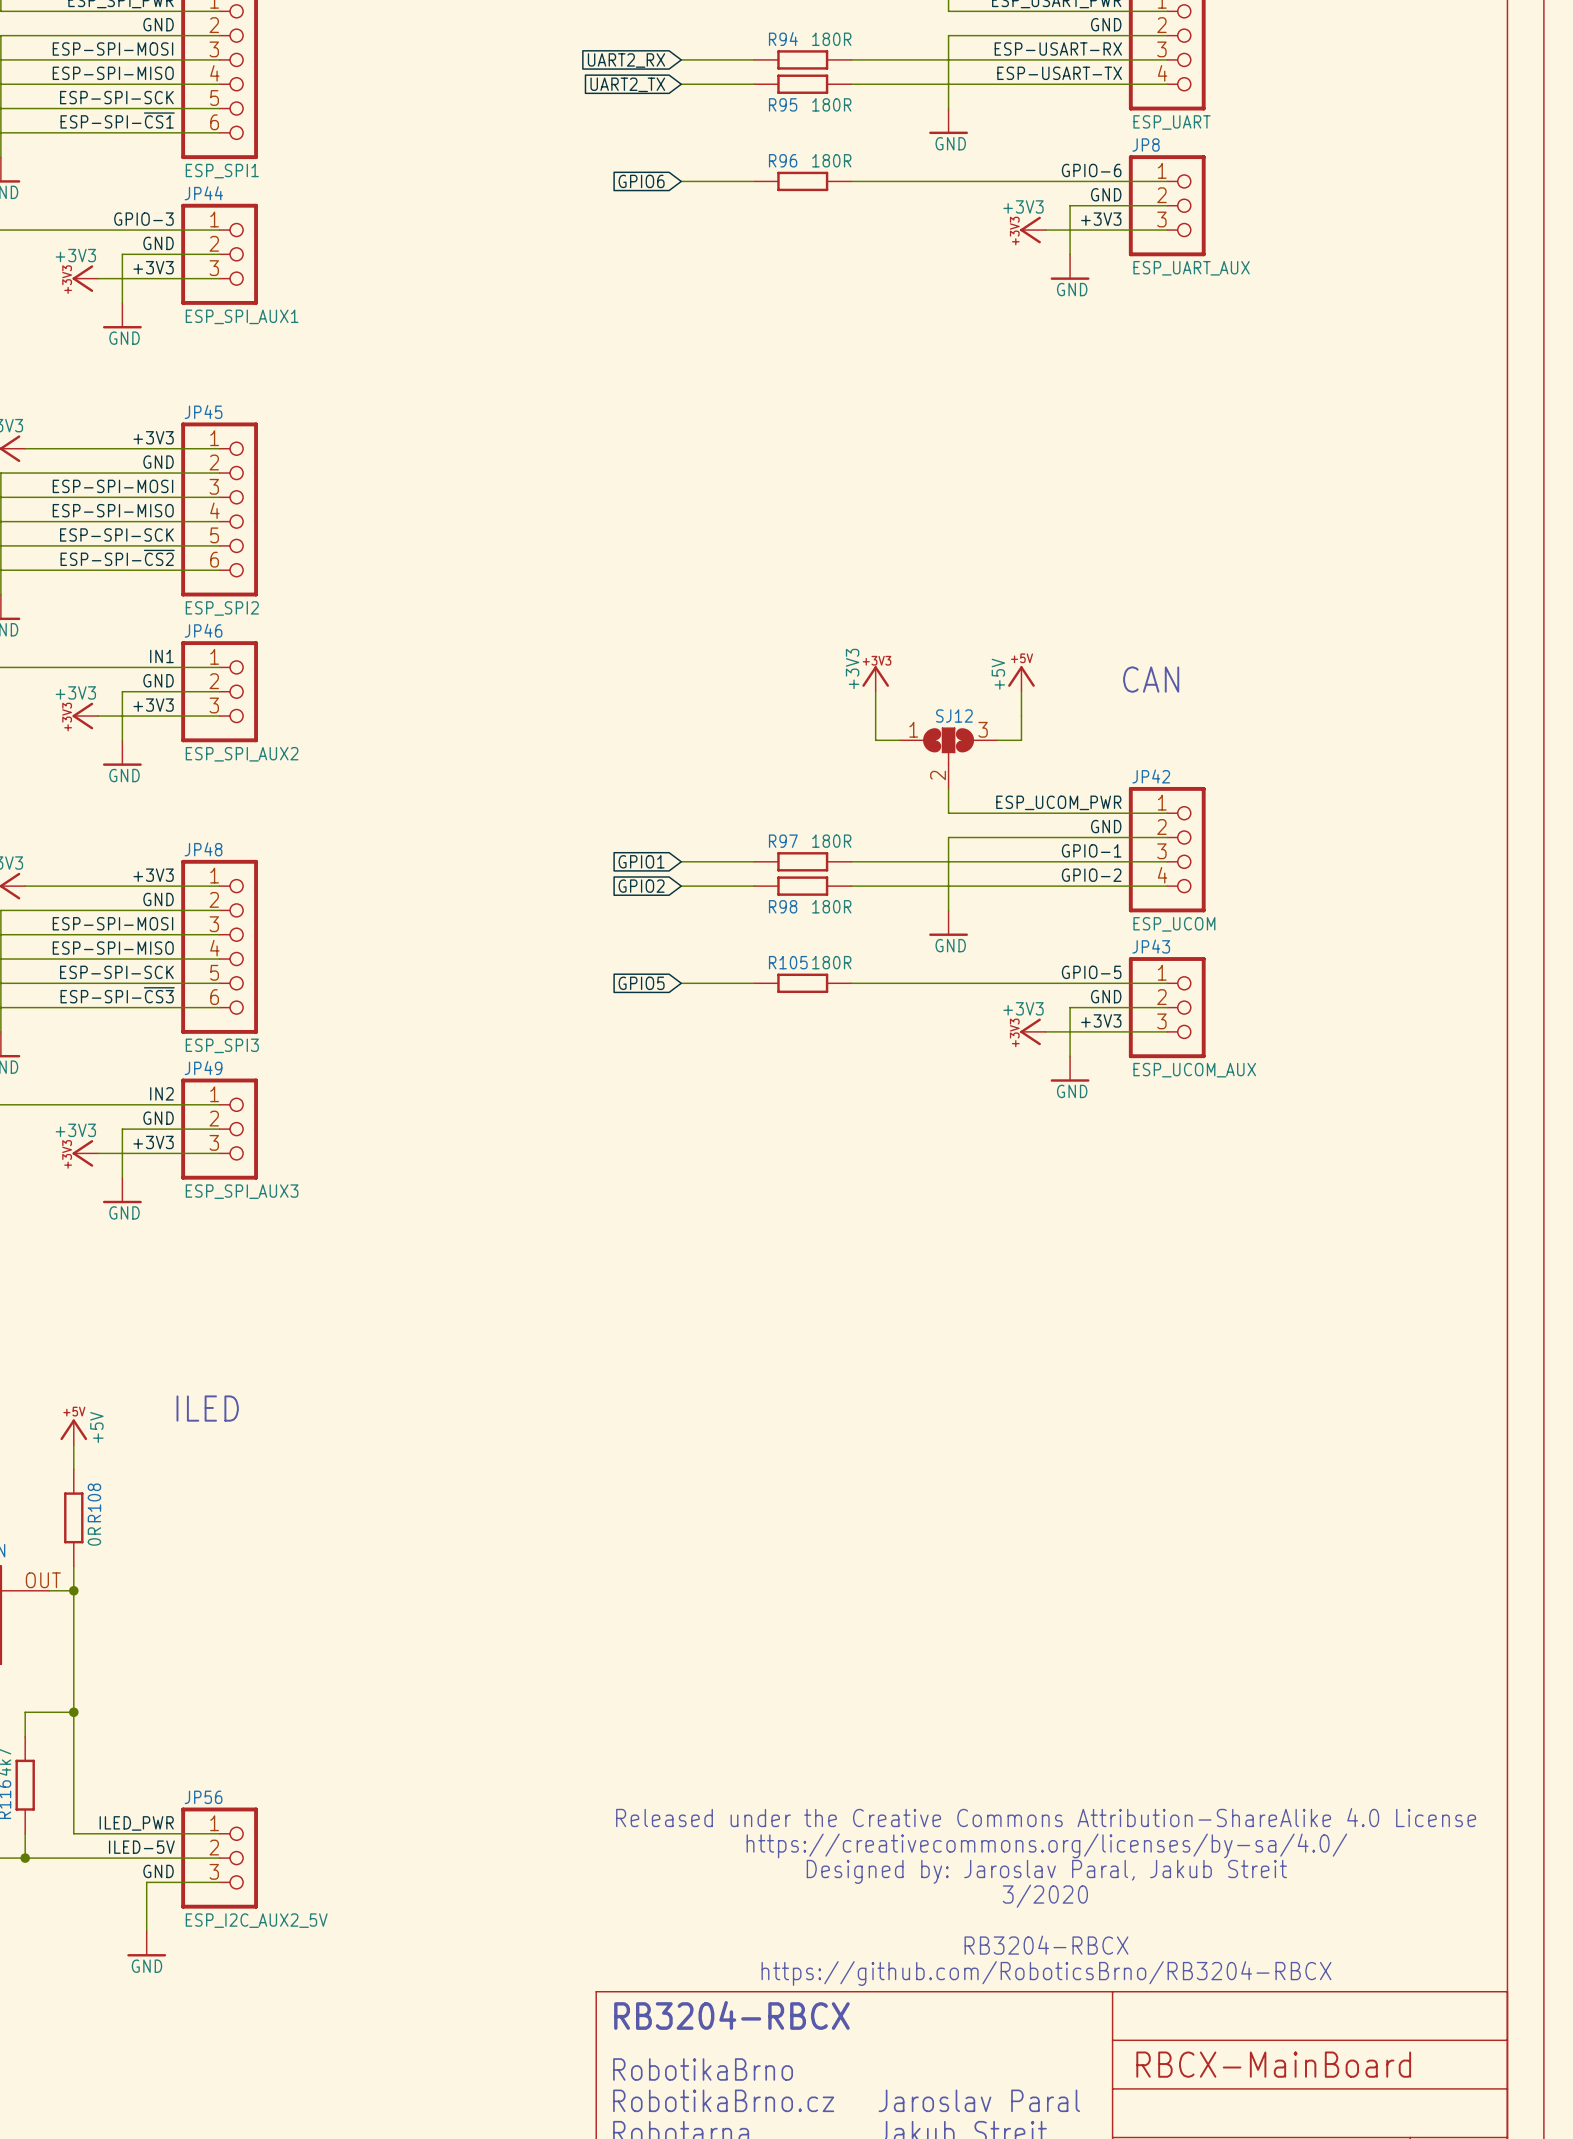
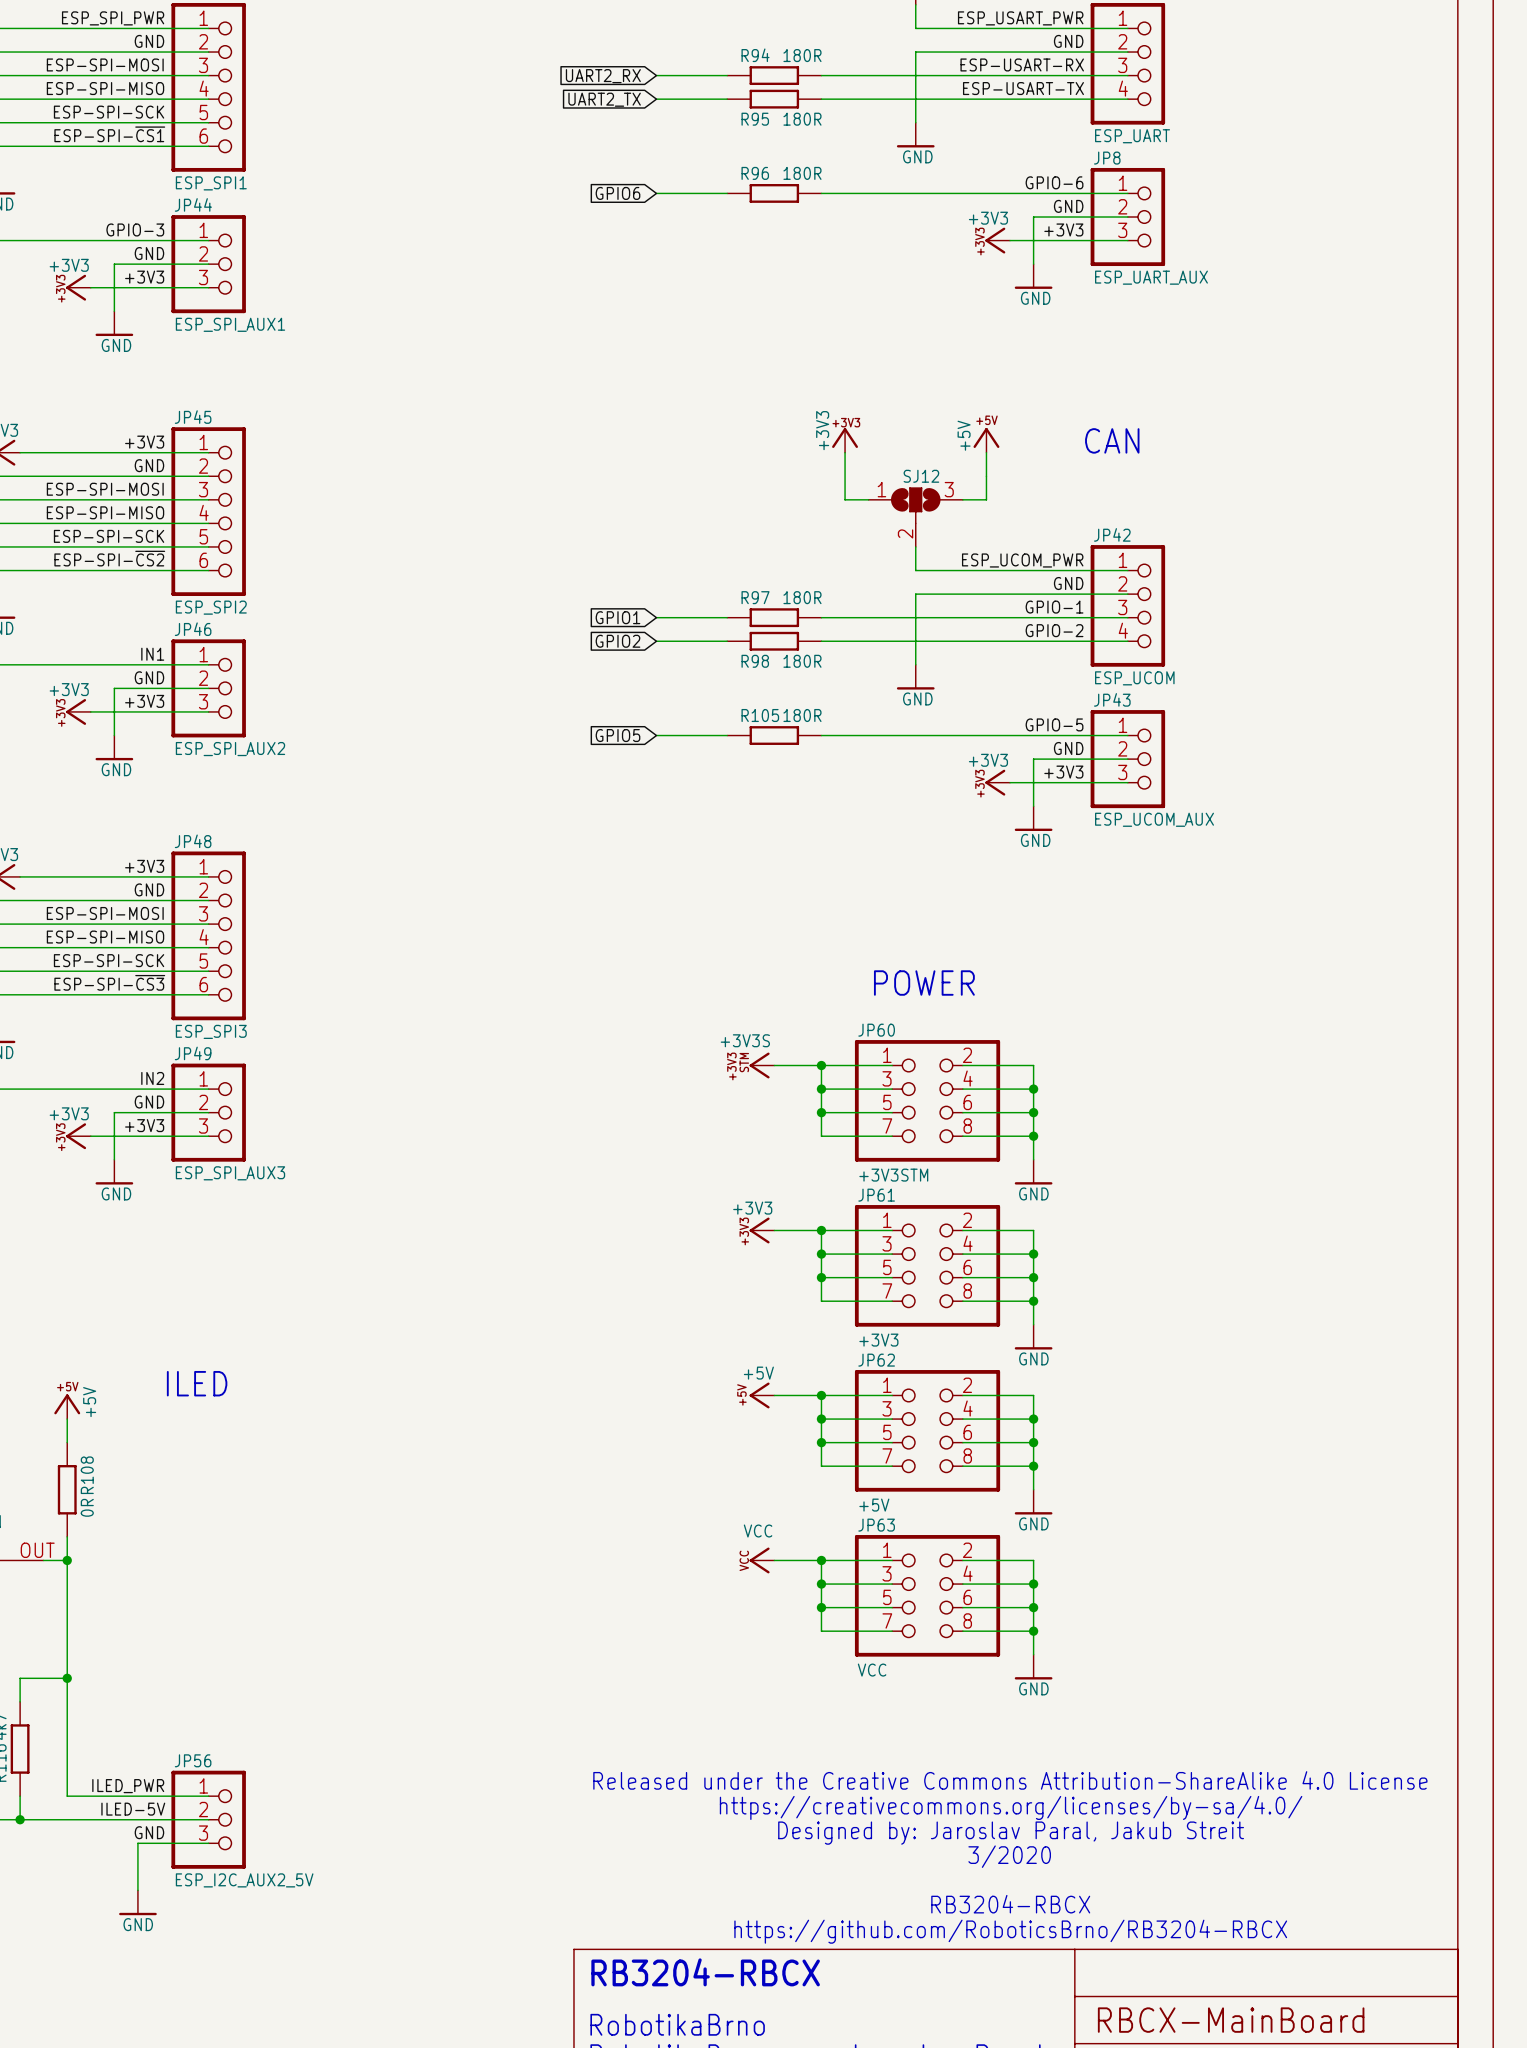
power symbol: none -> +3V3 (845, 440)
power symbol: none -> +5V (986, 440)
text: none -> CAN (1112, 440)
wire: none -> (845, 452) (845, 499) (868, 499)
wire: none -> (986, 452) (986, 499) (962, 499)
wire: none -> (915, 546) (915, 570) (1127, 570)
label: none -> ESP_UCOM_PWR (1022, 560)
label: none -> GND (1068, 583)
wire: none -> (1127, 594) (915, 594) (915, 664)
label: none -> GPIO-1 (1054, 607)
global label: none -> GPIO1 (617, 617)
wire: none -> (656, 617) (727, 617)
wire: none -> (821, 617) (1127, 617)
label: none -> GPIO-2 (1054, 630)
global label: none -> GPIO2 (617, 641)
power symbol: +3V3 (875, 678) -> none
power symbol: +5V (1021, 678) -> none
text: CAN (1151, 679) -> none
power symbol: none -> GND (915, 677)
wire: (875, 691) (875, 740) -> (821, 735) (845, 735)
wire: (1021, 691) (1021, 740) -> (1127, 735) (986, 735)
label: none -> GPIO-5 (1054, 724)
global label: none -> GPIO5 (617, 735)
SJ12 position: (948, 758) -> (915, 517)
wire: none -> (1127, 759) (1033, 759) (1033, 806)
label: none -> +3V3 (1063, 772)
wire: (948, 788) (948, 813) (1167, 813) -> none
power symbol: none -> +3V3 (997, 782)
wire: none -> (1010, 782) (1127, 782)
label: ESP_UCOM_PWR (1058, 802) -> none
power symbol: none -> GND (1033, 818)
label position: GND (1106, 826) -> GND (1068, 748)
wire: (1167, 837) (948, 837) (948, 910) -> none
JP42 position: (1167, 849) -> (1127, 605)
label: GPIO-1 (1091, 850) -> none
global label: GPIO1 (641, 861) -> none
wire: (681, 861) (754, 861) -> (656, 641) (727, 641)
R97 position: (802, 861) -> (774, 617)
wire: (851, 861) (1167, 861) -> (821, 641) (1127, 641)
label: GPIO-2 (1091, 875) -> none
global label: GPIO2 (641, 886) -> none
wire: (681, 886) (754, 886) -> (656, 735) (727, 735)
R98 position: (802, 886) -> (774, 641)
wire: (851, 886) (1167, 886) -> none
power symbol: GND (948, 923) -> none
label: GPIO-5 (1091, 972) -> none
global label: GPIO5 (641, 983) -> none
wire: (681, 983) (754, 983) -> (821, 1089) (892, 1089)
R105 position: (802, 983) -> (774, 735)
wire: (851, 983) (1167, 983) -> none
text: none -> POWER (924, 983)
label: GND (1106, 996) -> none
wire: (1167, 1007) (1070, 1007) (1070, 1056) -> none
JP43 position: (1167, 1007) -> (1127, 759)
label: +3V3 (1101, 1020) -> none
power symbol: +3V3 (1033, 1031) -> none
wire: (1045, 1031) (1167, 1031) -> none
power symbol: GND (1070, 1068) -> none
power symbol: none -> +3V3S (761, 1065)
wire: none -> (774, 1065) (892, 1065)
wire: none -> (821, 1065) (821, 1136) (892, 1136)
junction: none -> (821, 1065)
wire: none -> (962, 1065) (1033, 1065) (1033, 1159)
junction: none -> (821, 1089)
wire: none -> (962, 1089) (1033, 1089)
junction: none -> (1033, 1089)
JP60: none -> +3V3STM (927, 1100)
wire: none -> (821, 1112) (892, 1112)
junction: none -> (821, 1112)
wire: none -> (962, 1112) (1033, 1112)
junction: none -> (1033, 1112)
wire: none -> (962, 1136) (1033, 1136)
junction: none -> (1033, 1136)
power symbol: none -> GND (1033, 1172)
power symbol: none -> +3V3 (761, 1230)
wire: none -> (774, 1230) (892, 1230)
wire: none -> (821, 1230) (821, 1301) (892, 1301)
junction: none -> (821, 1230)
wire: none -> (962, 1230) (1033, 1230) (1033, 1324)
wire: none -> (821, 1254) (892, 1254)
junction: none -> (821, 1254)
wire: none -> (962, 1254) (1033, 1254)
junction: none -> (1033, 1254)
JP61: none -> +3V3 (927, 1265)
wire: none -> (821, 1277) (892, 1277)
junction: none -> (821, 1277)
wire: none -> (962, 1277) (1033, 1277)
junction: none -> (1033, 1277)
wire: none -> (962, 1301) (1033, 1301)
junction: none -> (1033, 1301)
power symbol: none -> GND (1033, 1337)
power symbol: none -> +5V (761, 1395)
wire: none -> (774, 1395) (892, 1395)
wire: none -> (821, 1395) (821, 1466) (892, 1466)
junction: none -> (821, 1395)
wire: none -> (962, 1395) (1033, 1395) (1033, 1489)
wire: none -> (821, 1419) (892, 1419)
junction: none -> (821, 1419)
wire: none -> (962, 1419) (1033, 1419)
junction: none -> (1033, 1419)
JP62: none -> +5V (927, 1430)
wire: none -> (821, 1442) (892, 1442)
junction: none -> (821, 1442)
wire: none -> (962, 1442) (1033, 1442)
junction: none -> (1033, 1442)
wire: none -> (962, 1466) (1033, 1466)
junction: none -> (1033, 1466)
power symbol: none -> GND (1033, 1502)
power symbol: none -> VCC (761, 1560)
wire: none -> (774, 1560) (892, 1560)
wire: none -> (821, 1560) (821, 1631) (892, 1631)
junction: none -> (821, 1560)
wire: none -> (962, 1560) (1033, 1560) (1033, 1654)
wire: none -> (821, 1584) (892, 1584)
junction: none -> (821, 1584)
wire: none -> (962, 1584) (1033, 1584)
junction: none -> (1033, 1584)
JP63: none -> VCC (927, 1595)
wire: none -> (821, 1607) (892, 1607)
junction: none -> (821, 1607)
wire: none -> (962, 1607) (1033, 1607)
junction: none -> (1033, 1607)
wire: none -> (962, 1631) (1033, 1631)
junction: none -> (1033, 1631)
power symbol: none -> GND (1033, 1667)

